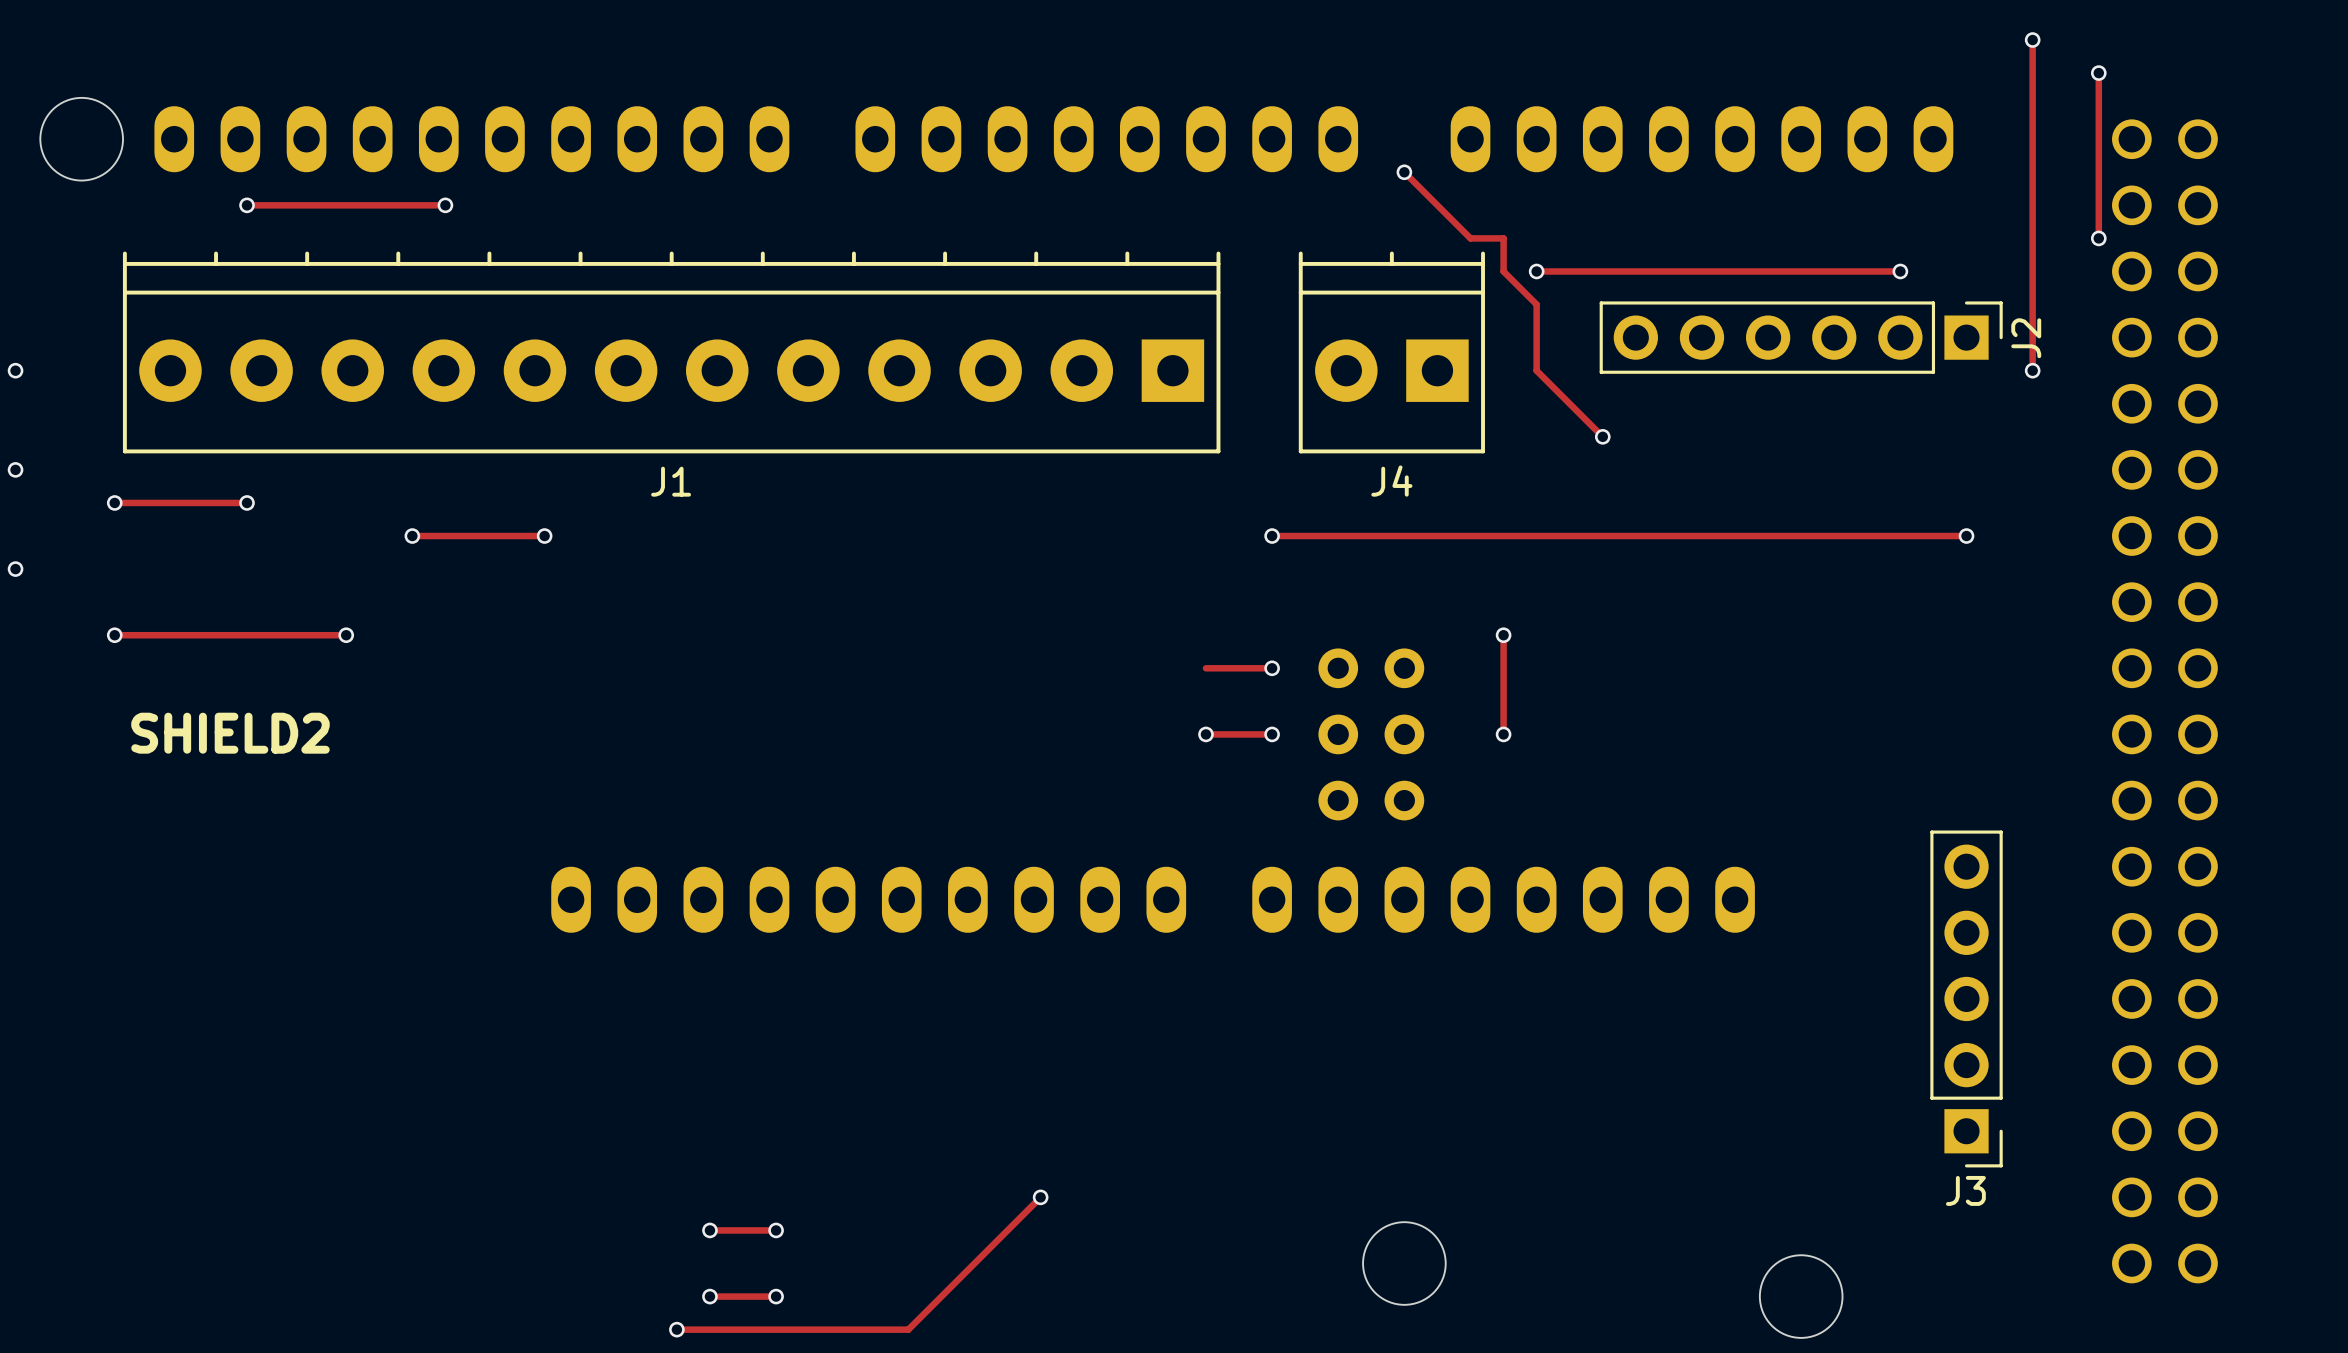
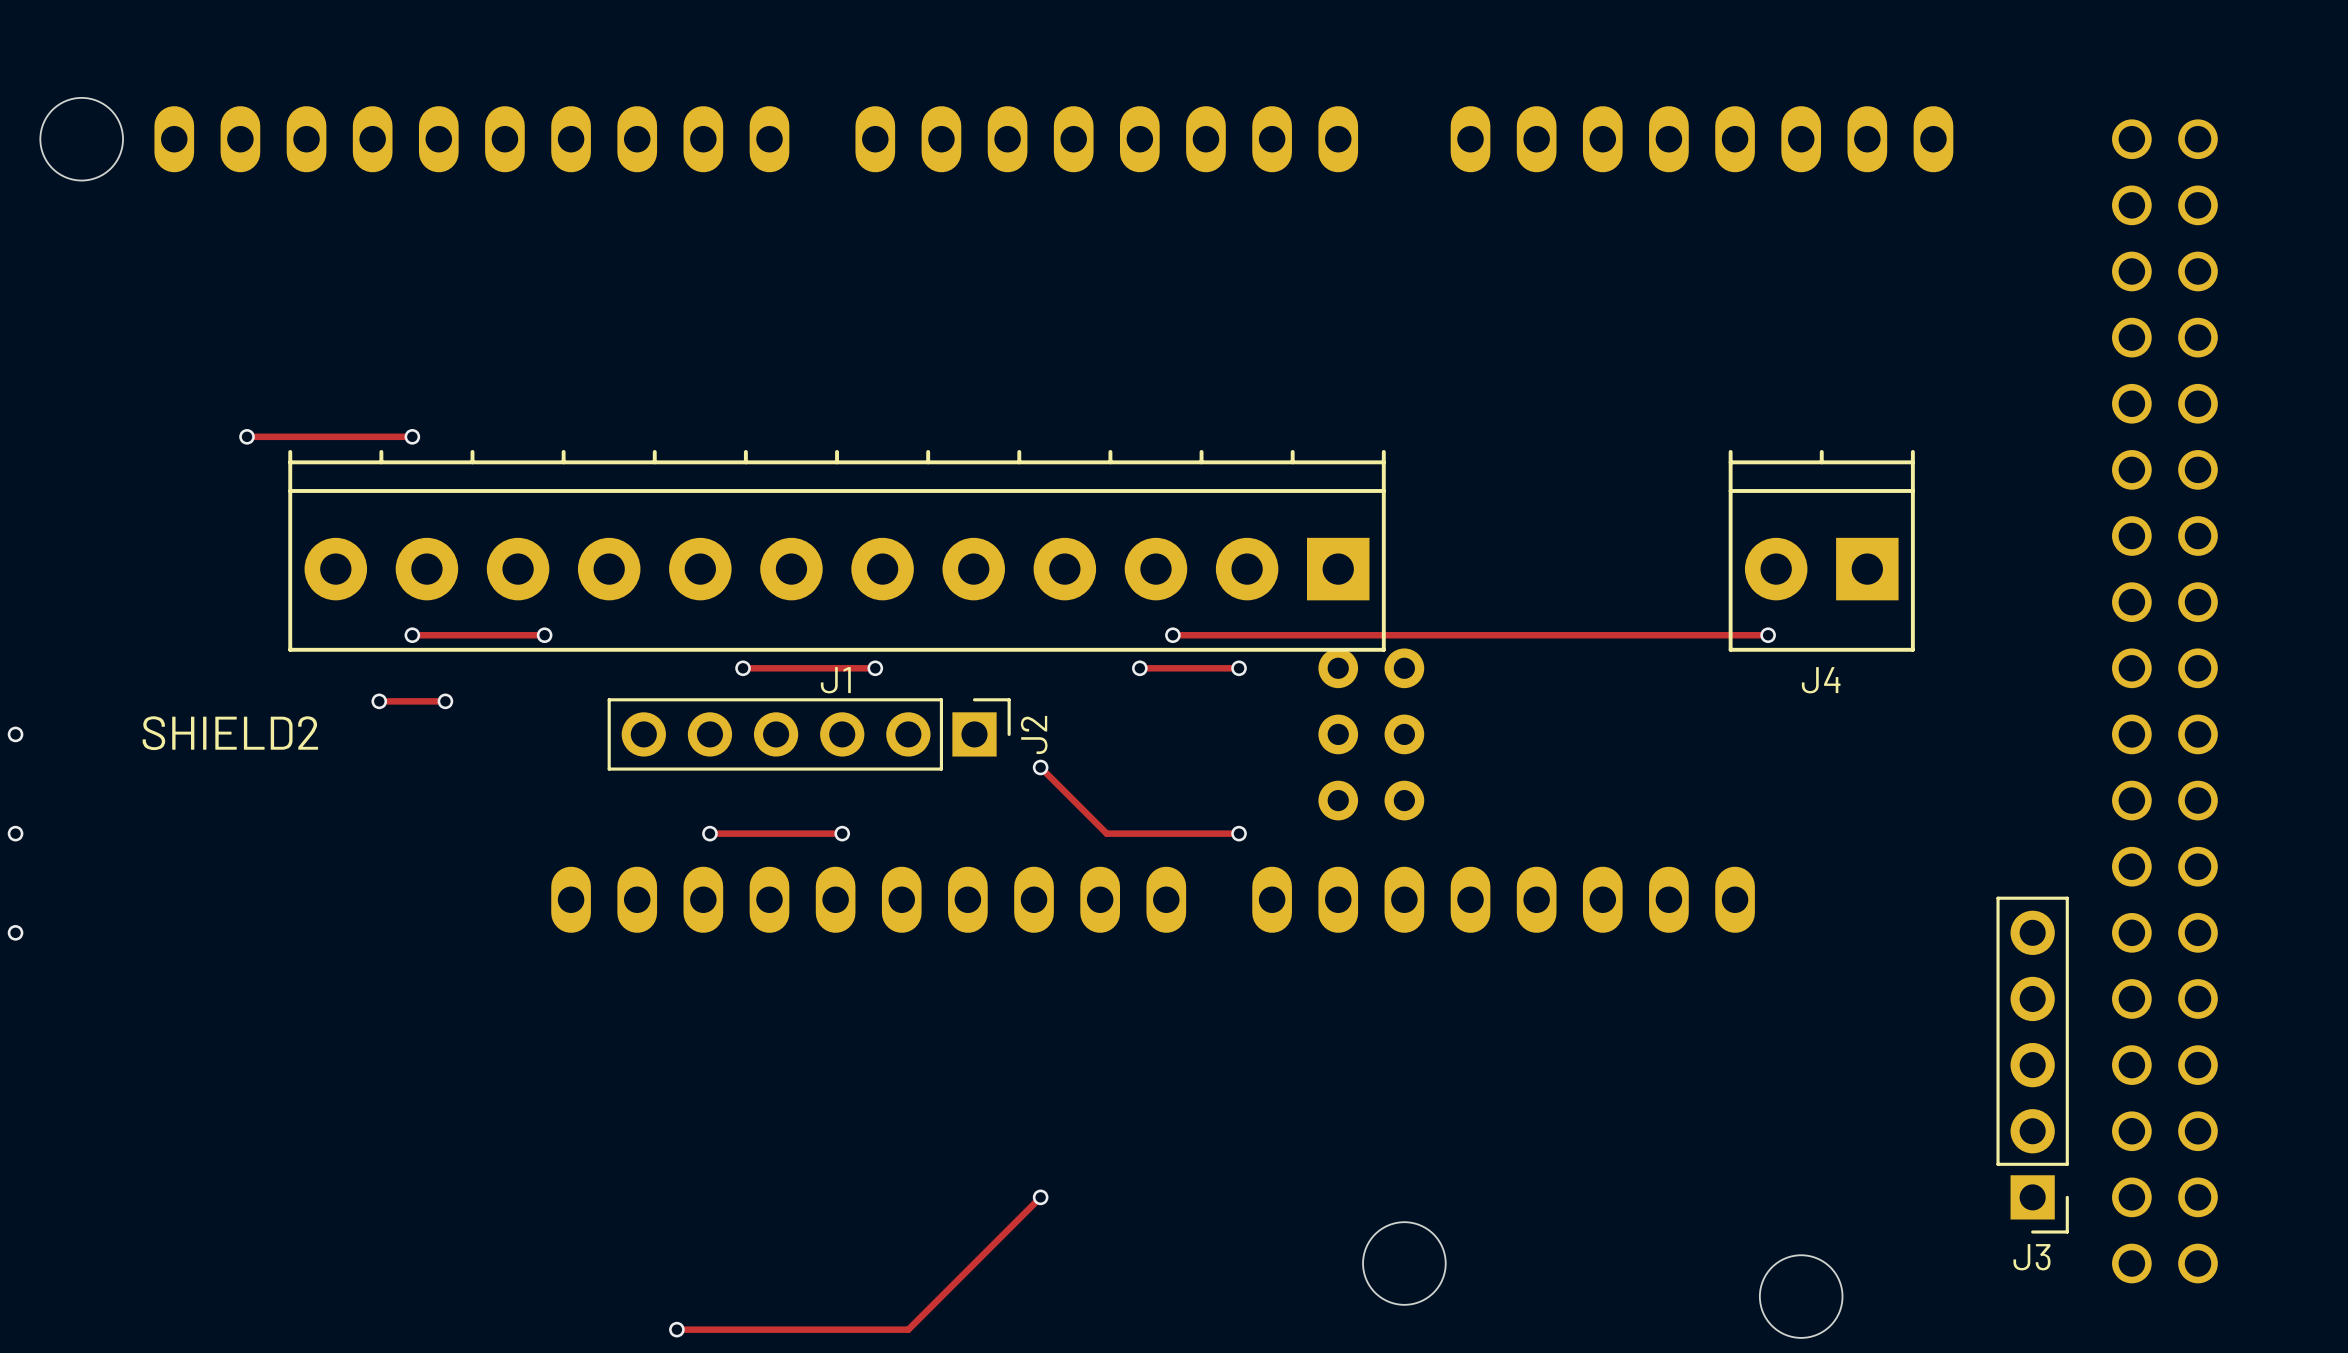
track: (2032, 40) (2032, 370) -> none
via: (2032, 40) -> none
track: (2098, 73) (2098, 238) -> none
via: (2098, 73) -> none
track: (1404, 172) (1470, 238) (1503, 238) (1503, 271) (1536, 304) (1536, 370) (1602, 436) -> none
via: (1404, 172) -> none
track: (247, 205) (445, 205) -> none
via: (247, 205) -> none
via: (445, 205) -> none
via: (2098, 238) -> none
track: (1536, 271) (1900, 271) -> none
via: (1536, 271) -> none
via: (1900, 271) -> none
J2 position: (1801, 337) -> (809, 734)
J1 position: (671, 352) -> (837, 550)
J4 position: (1391, 352) -> (1821, 550)
via: (15, 370) -> none
via: (2032, 370) -> none
track: none -> (247, 436) (412, 436)
via: none -> (412, 436)
via: (1602, 436) -> none
via: (15, 469) -> none
track: (114, 502) (247, 502) -> (743, 668) (875, 668)
via: (114, 502) -> none
via position: (247, 502) -> (247, 436)
track: (412, 536) (544, 536) -> (412, 635) (544, 635)
via: (412, 536) -> none
via: (544, 536) -> none
track: (1272, 536) (1966, 536) -> none
via: (1272, 536) -> none
via: (1966, 536) -> none
via: (15, 569) -> none
track: (114, 635) (346, 635) -> none
via: (114, 635) -> none
via: (346, 635) -> none
via: none -> (412, 635)
via: none -> (544, 635)
track: none -> (1172, 635) (1768, 635)
via: none -> (1172, 635)
track: (1503, 635) (1503, 734) -> none
via: (1503, 635) -> none
via: none -> (1768, 635)
via: none -> (743, 668)
via: none -> (875, 668)
via: none -> (1139, 668)
track: (1239, 668) (1272, 668) -> none
via position: (1272, 668) -> (1239, 668)
via: none -> (379, 701)
via: none -> (445, 701)
via: none -> (15, 734)
track: (1205, 734) (1272, 734) -> (1139, 668) (1205, 668)
via: (1205, 734) -> none
via: (1272, 734) -> none
via: (1503, 734) -> none
track: none -> (1040, 767) (1106, 833) (1239, 833)
via: none -> (1040, 767)
via: none -> (15, 833)
track: none -> (709, 833) (842, 833)
via: none -> (709, 833)
via: none -> (842, 833)
via: none -> (1239, 833)
via: none -> (15, 932)
J3 position: (1966, 998) -> (2032, 1065)
track: (709, 1230) (776, 1230) -> (379, 701) (445, 701)
via: (709, 1230) -> none
via: (776, 1230) -> none
track: (709, 1296) (776, 1296) -> none
via: (709, 1296) -> none
via: (776, 1296) -> none

